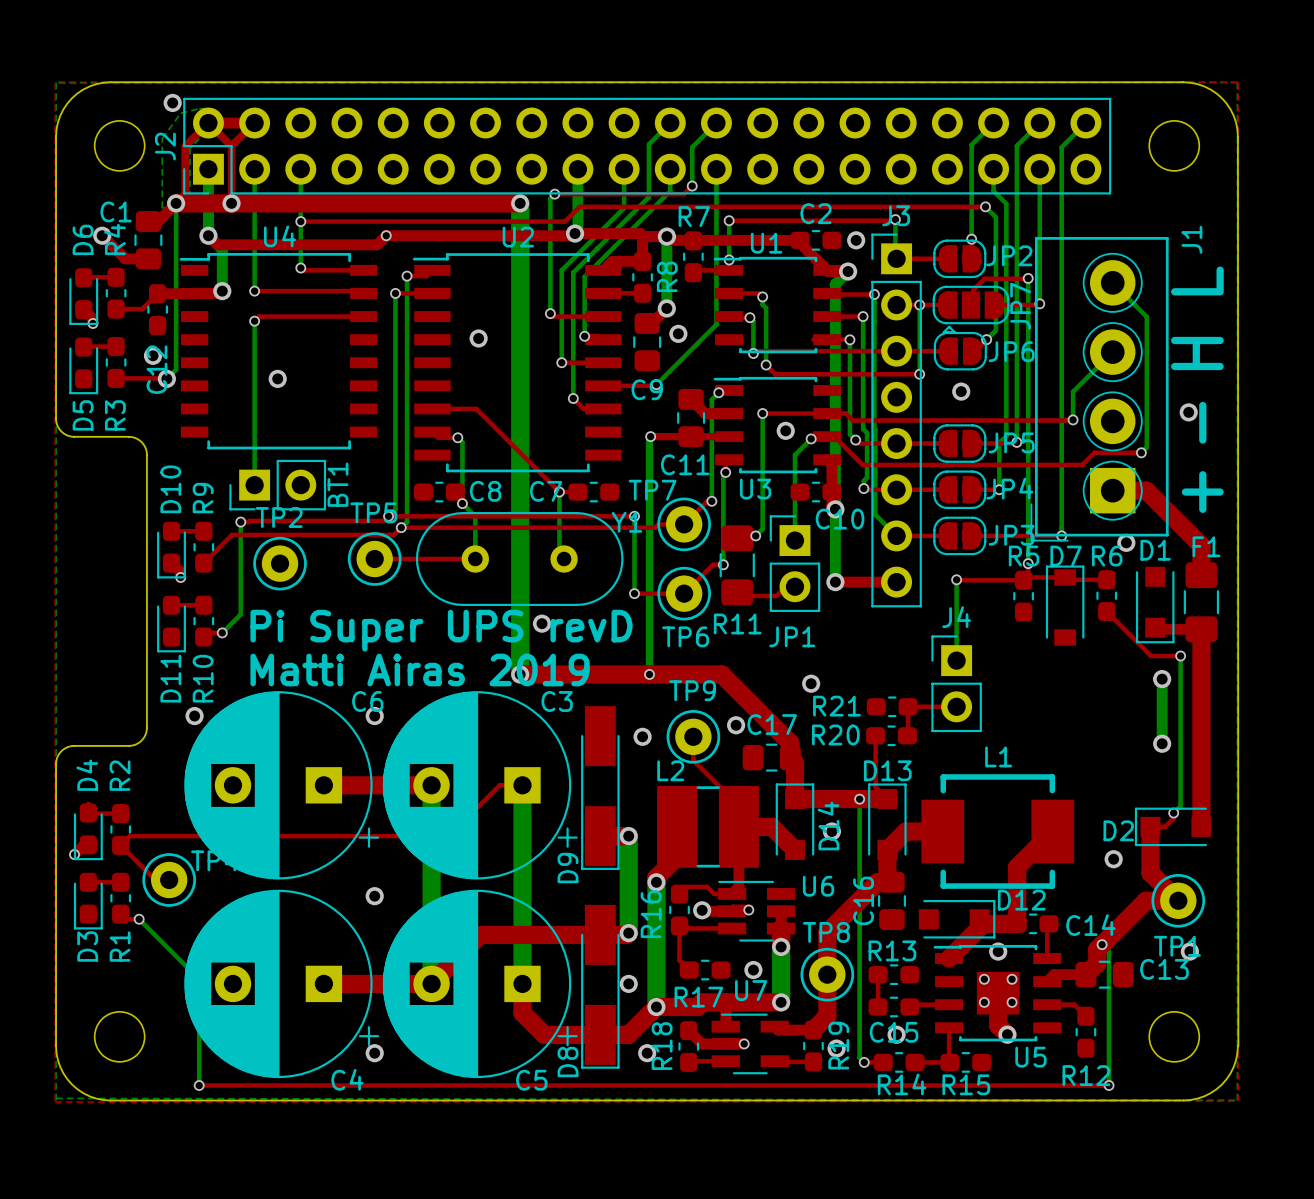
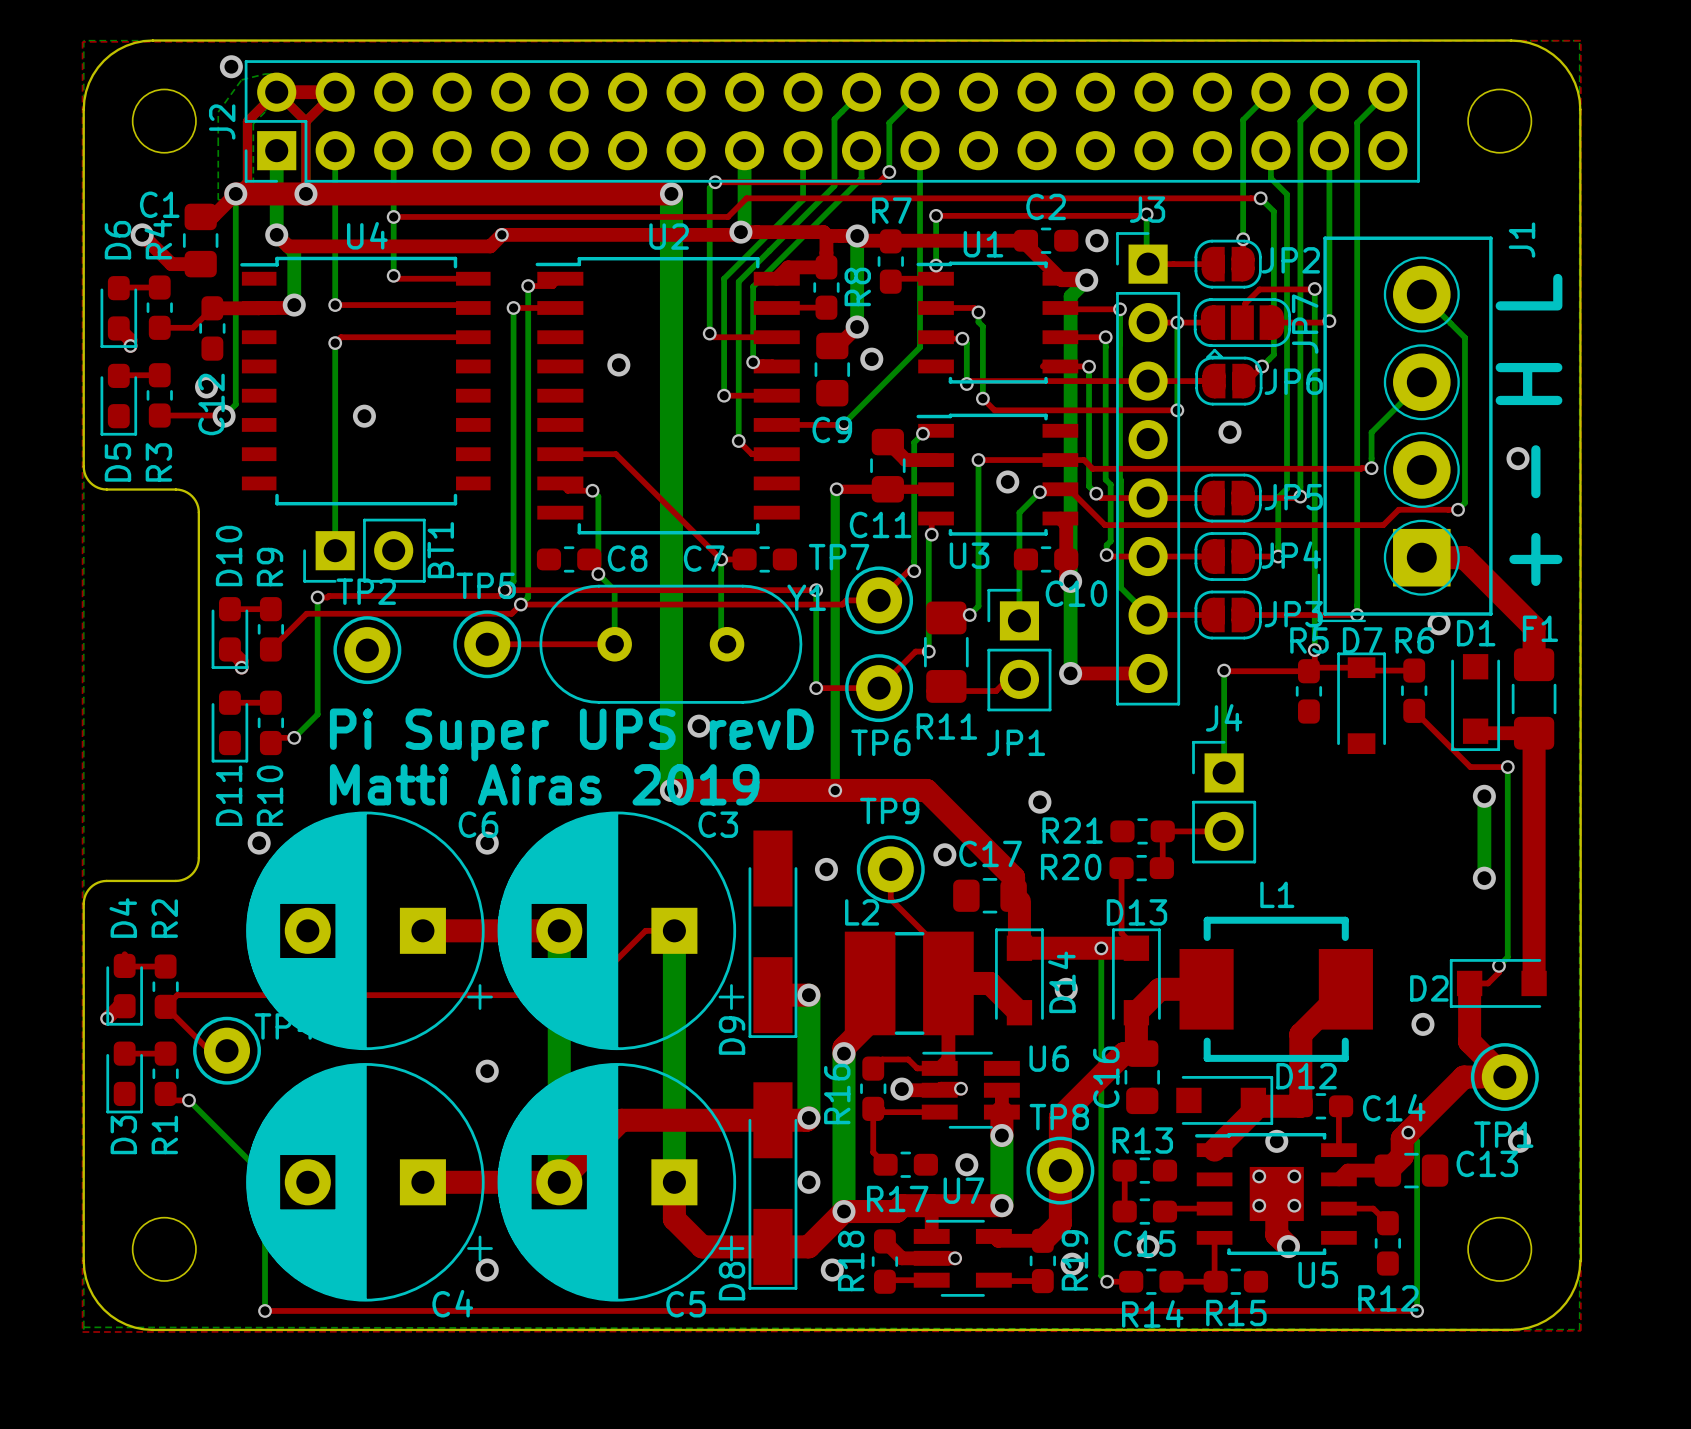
R14 name: R14 (902, 1084) -> R15 (1236, 1313)
R15 name: R15 (966, 1084) -> R14 (1152, 1313)

